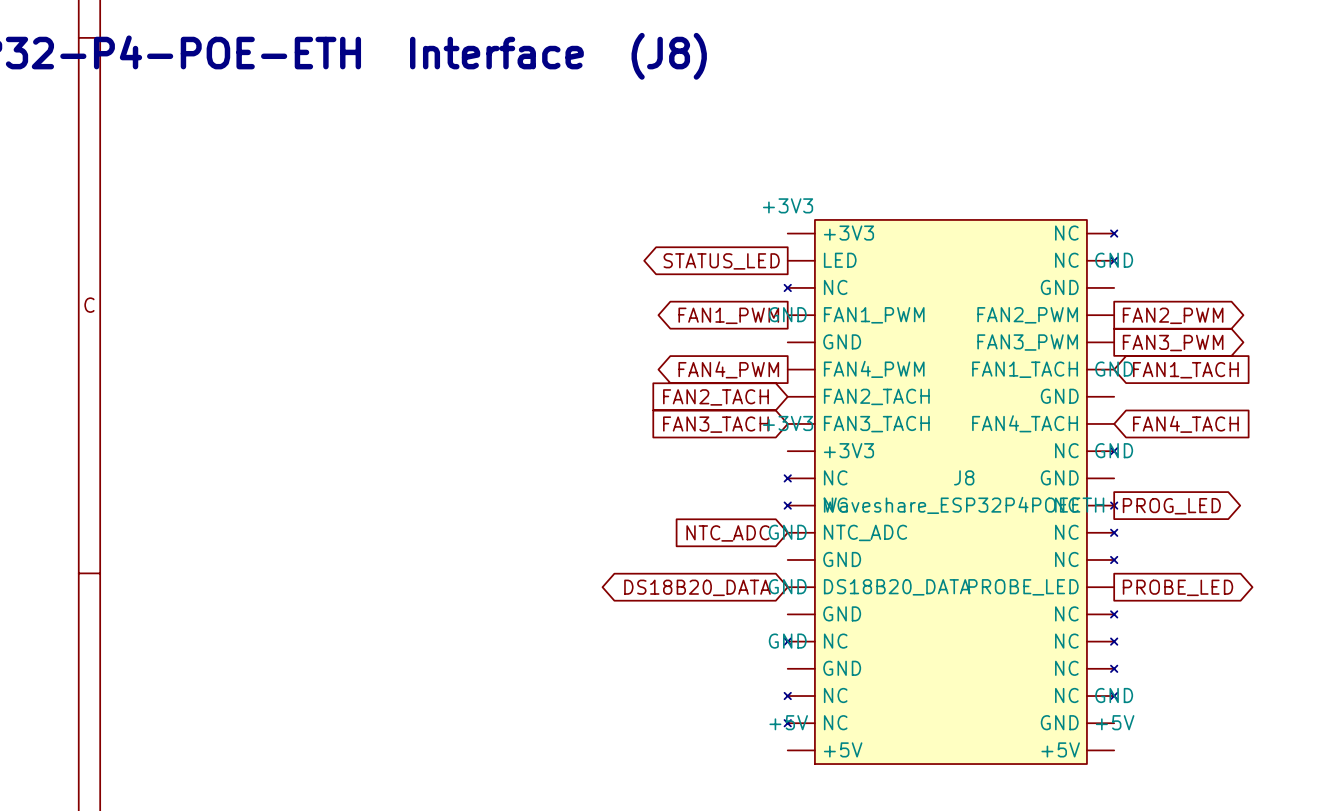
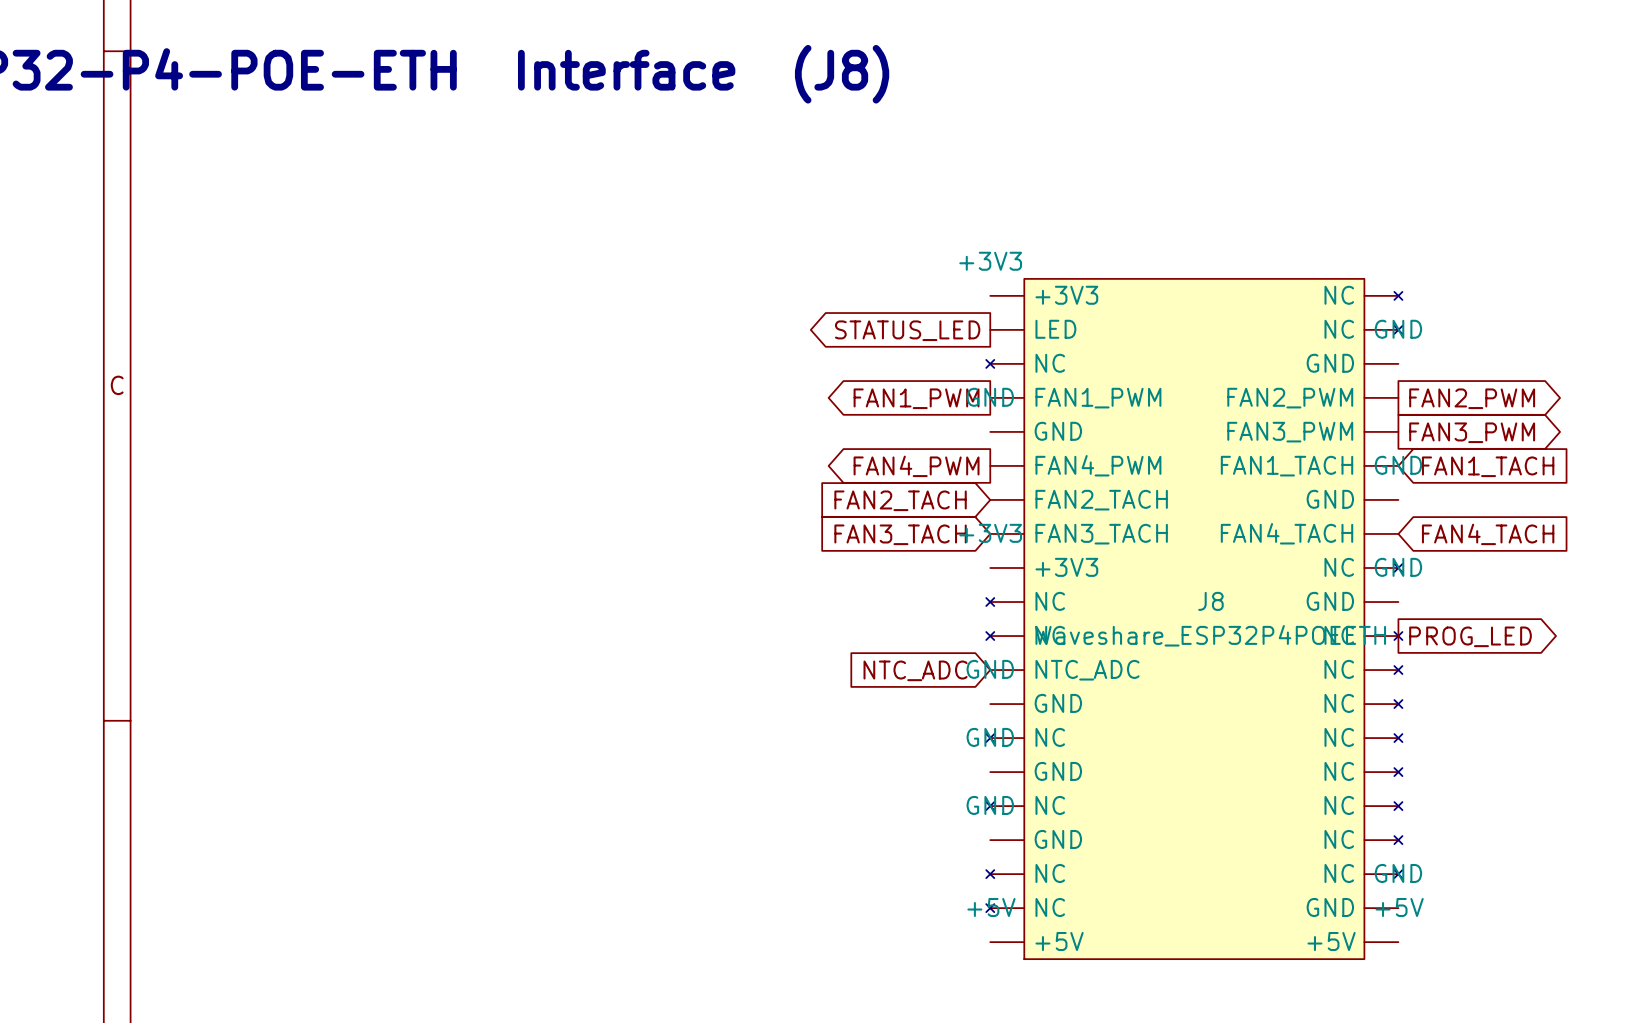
J8 symbol: [784, 219, 1118, 765] -> [986, 278, 1403, 960]
global label: DS18B20_DATA (697, 587) -> none
global label: PROBE_LED (1177, 587) -> none

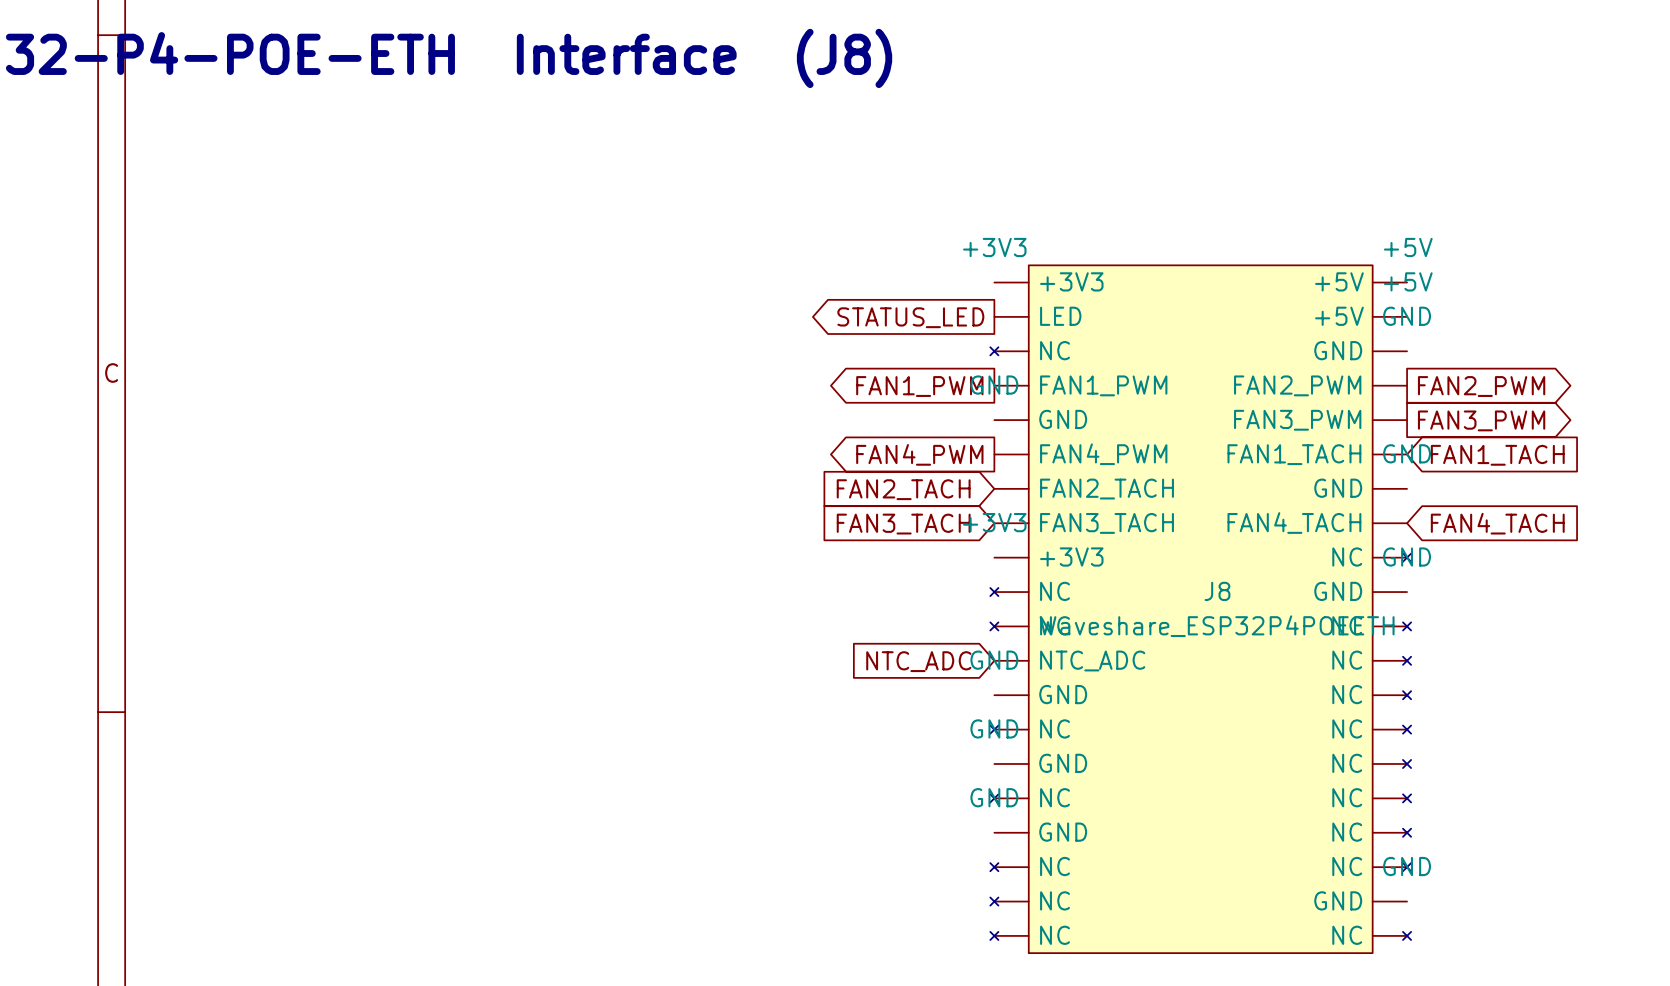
power symbol: none -> +5V (1408, 247)
J8 symbol: [986, 278, 1403, 960] -> [990, 265, 1412, 954]
power symbol: none -> +5V (1408, 281)
global label: PROG_LED (1470, 636) -> none
power symbol: +5V (991, 907) -> none
power symbol: +5V (1399, 907) -> none

